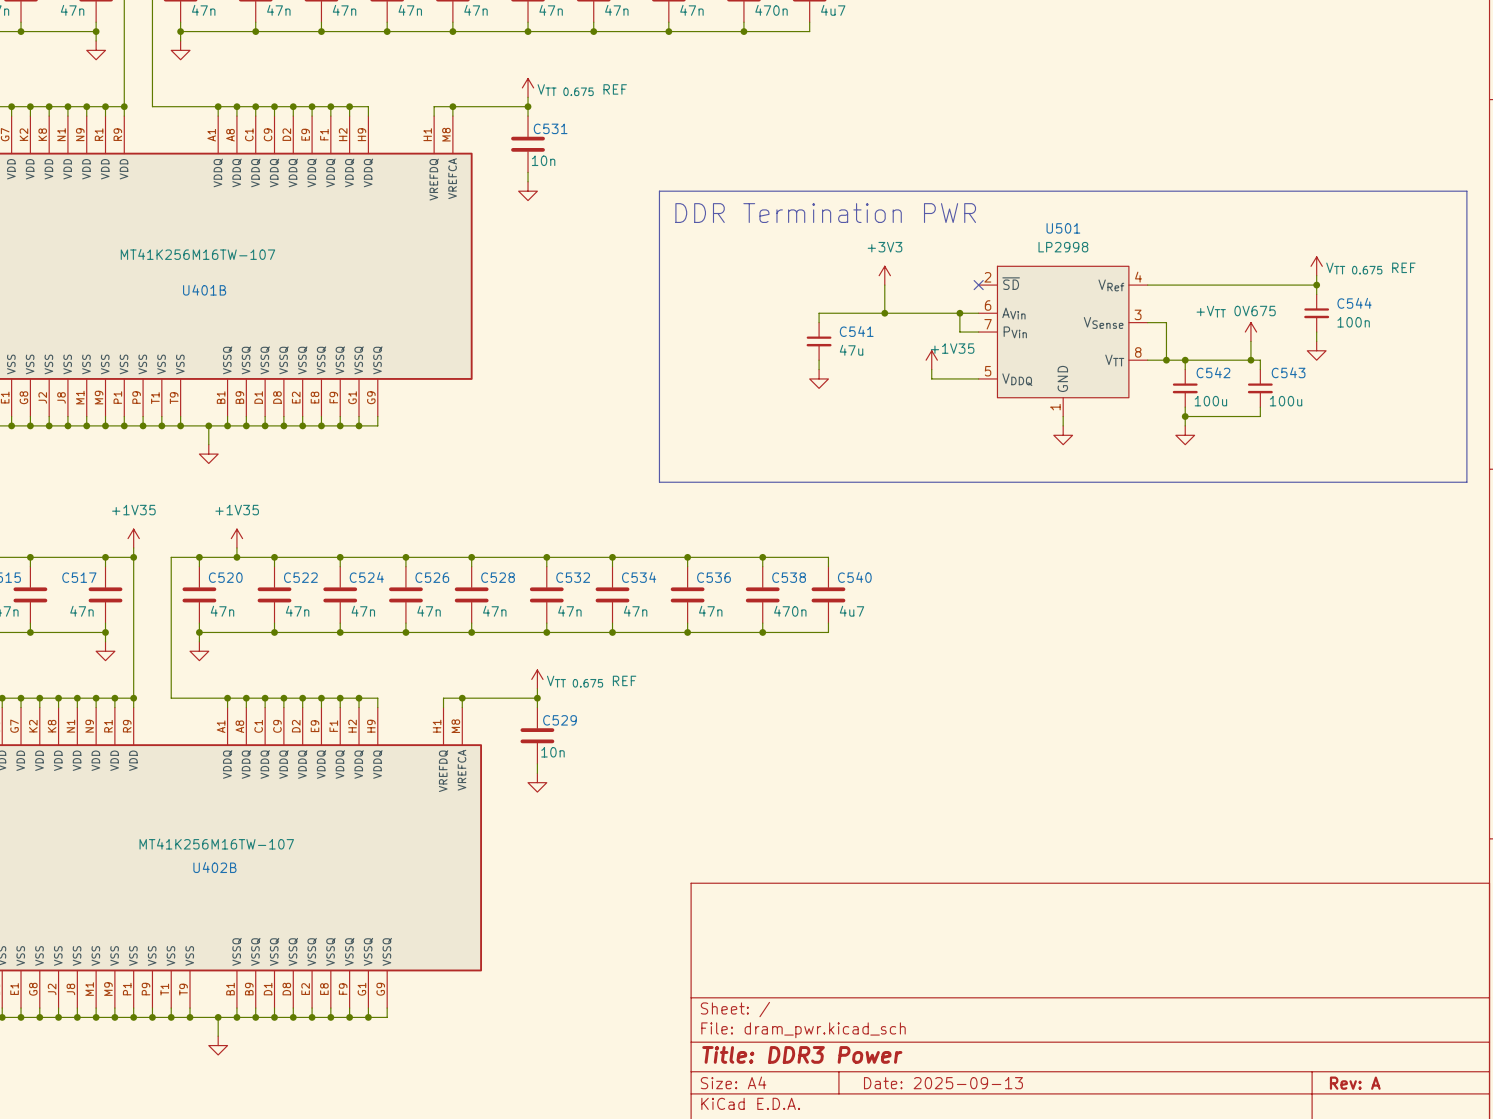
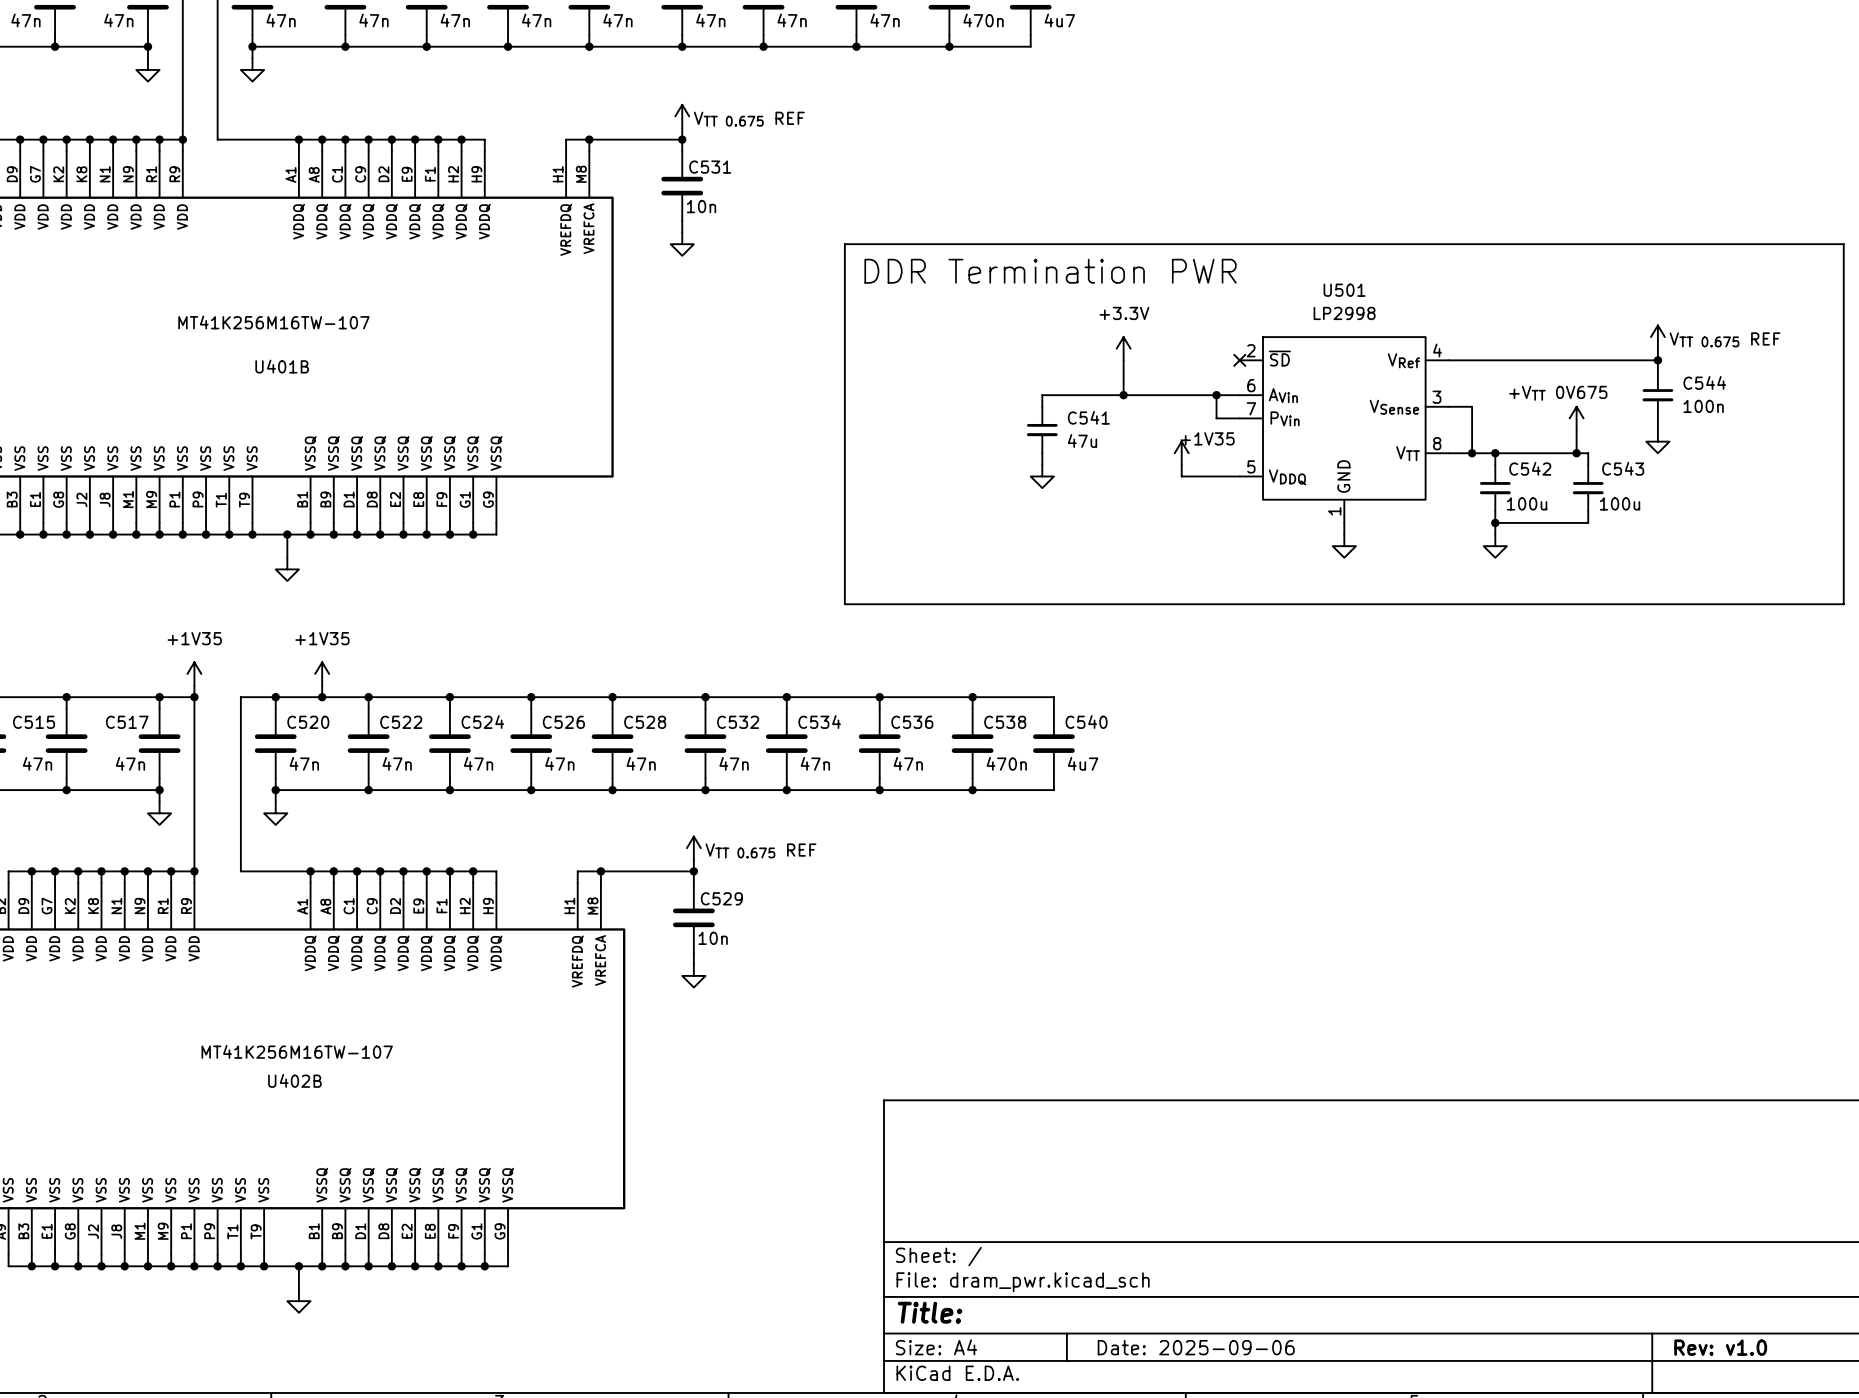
power symbol: +3V3 (884, 275) -> +3.3V (1123, 348)
title block: Title: DDR3 Power (802, 1054) -> Title: (930, 1312)
title block: Date: 2025-09-13 (943, 1083) -> Date: 2025-09-06 (1196, 1347)
title block: Rev: A (1355, 1083) -> Rev: v1.0 (1720, 1347)

